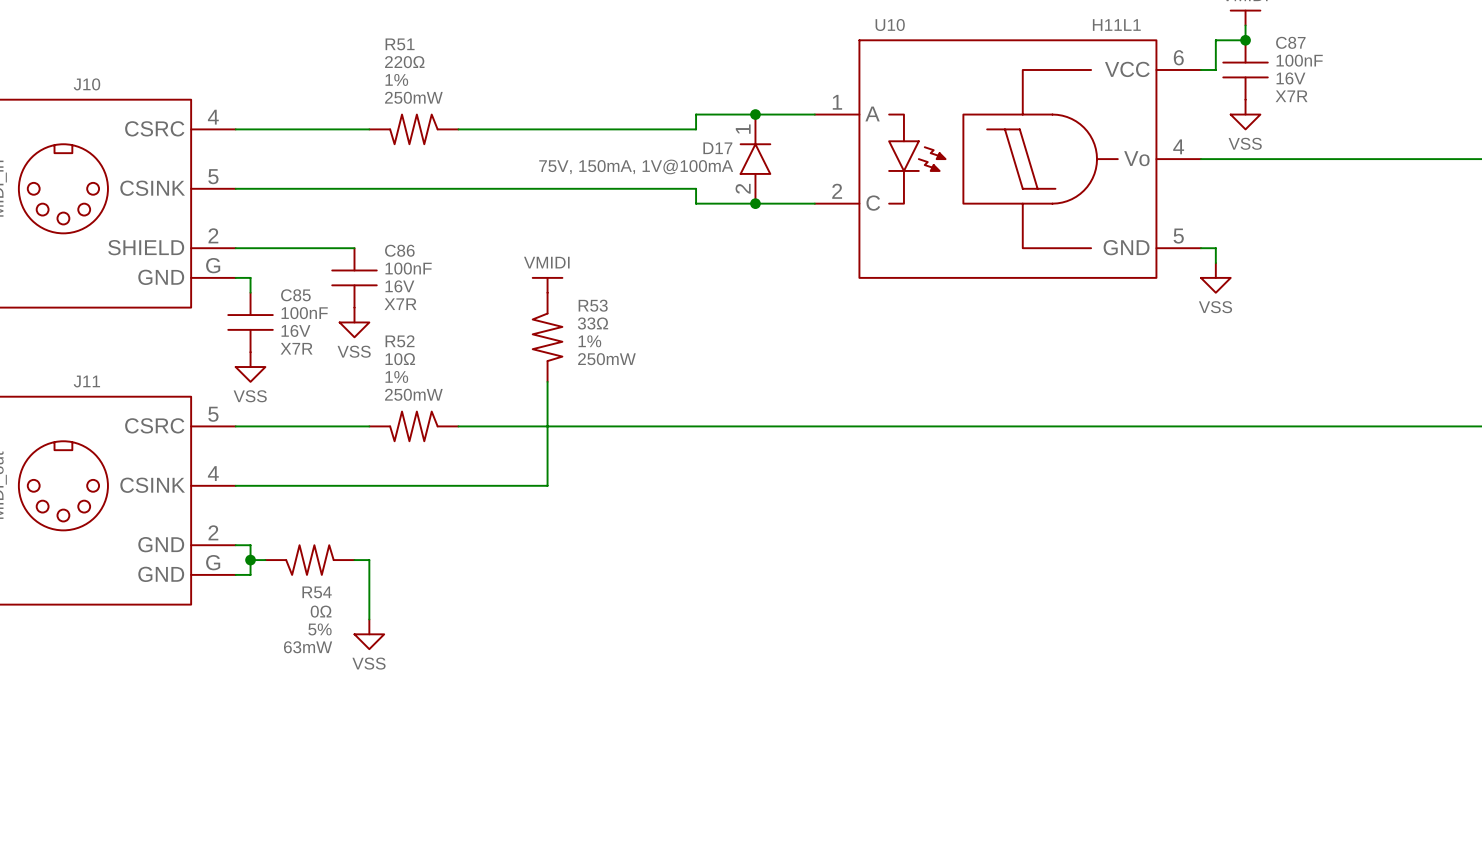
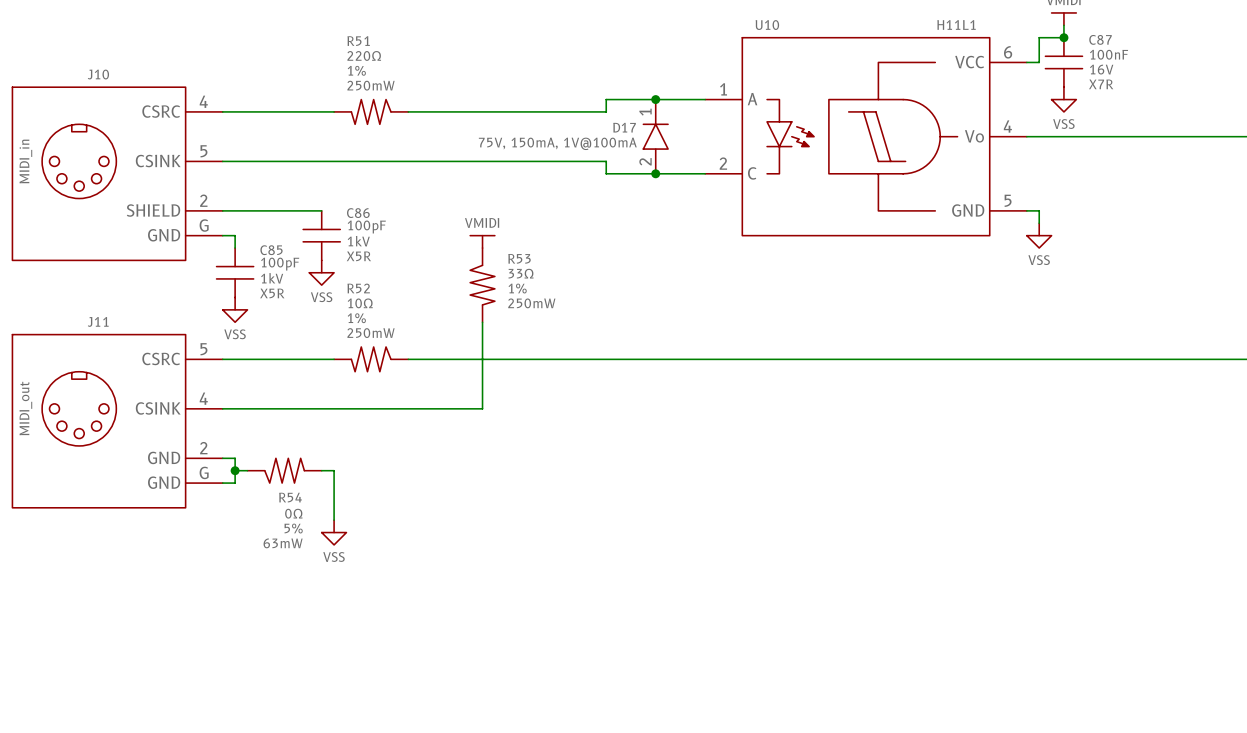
C86 text: 100nF (408, 268) -> 100pF (366, 226)
C86 text: 16V (399, 286) -> 1kV (358, 241)
C86 text: X7R (400, 304) -> X5R (358, 256)
C85 text: 100nF (304, 313) -> 100pF (280, 264)
C85 text: 16V (295, 330) -> 1kV (272, 278)
C85 text: X7R (296, 348) -> X5R (272, 293)

